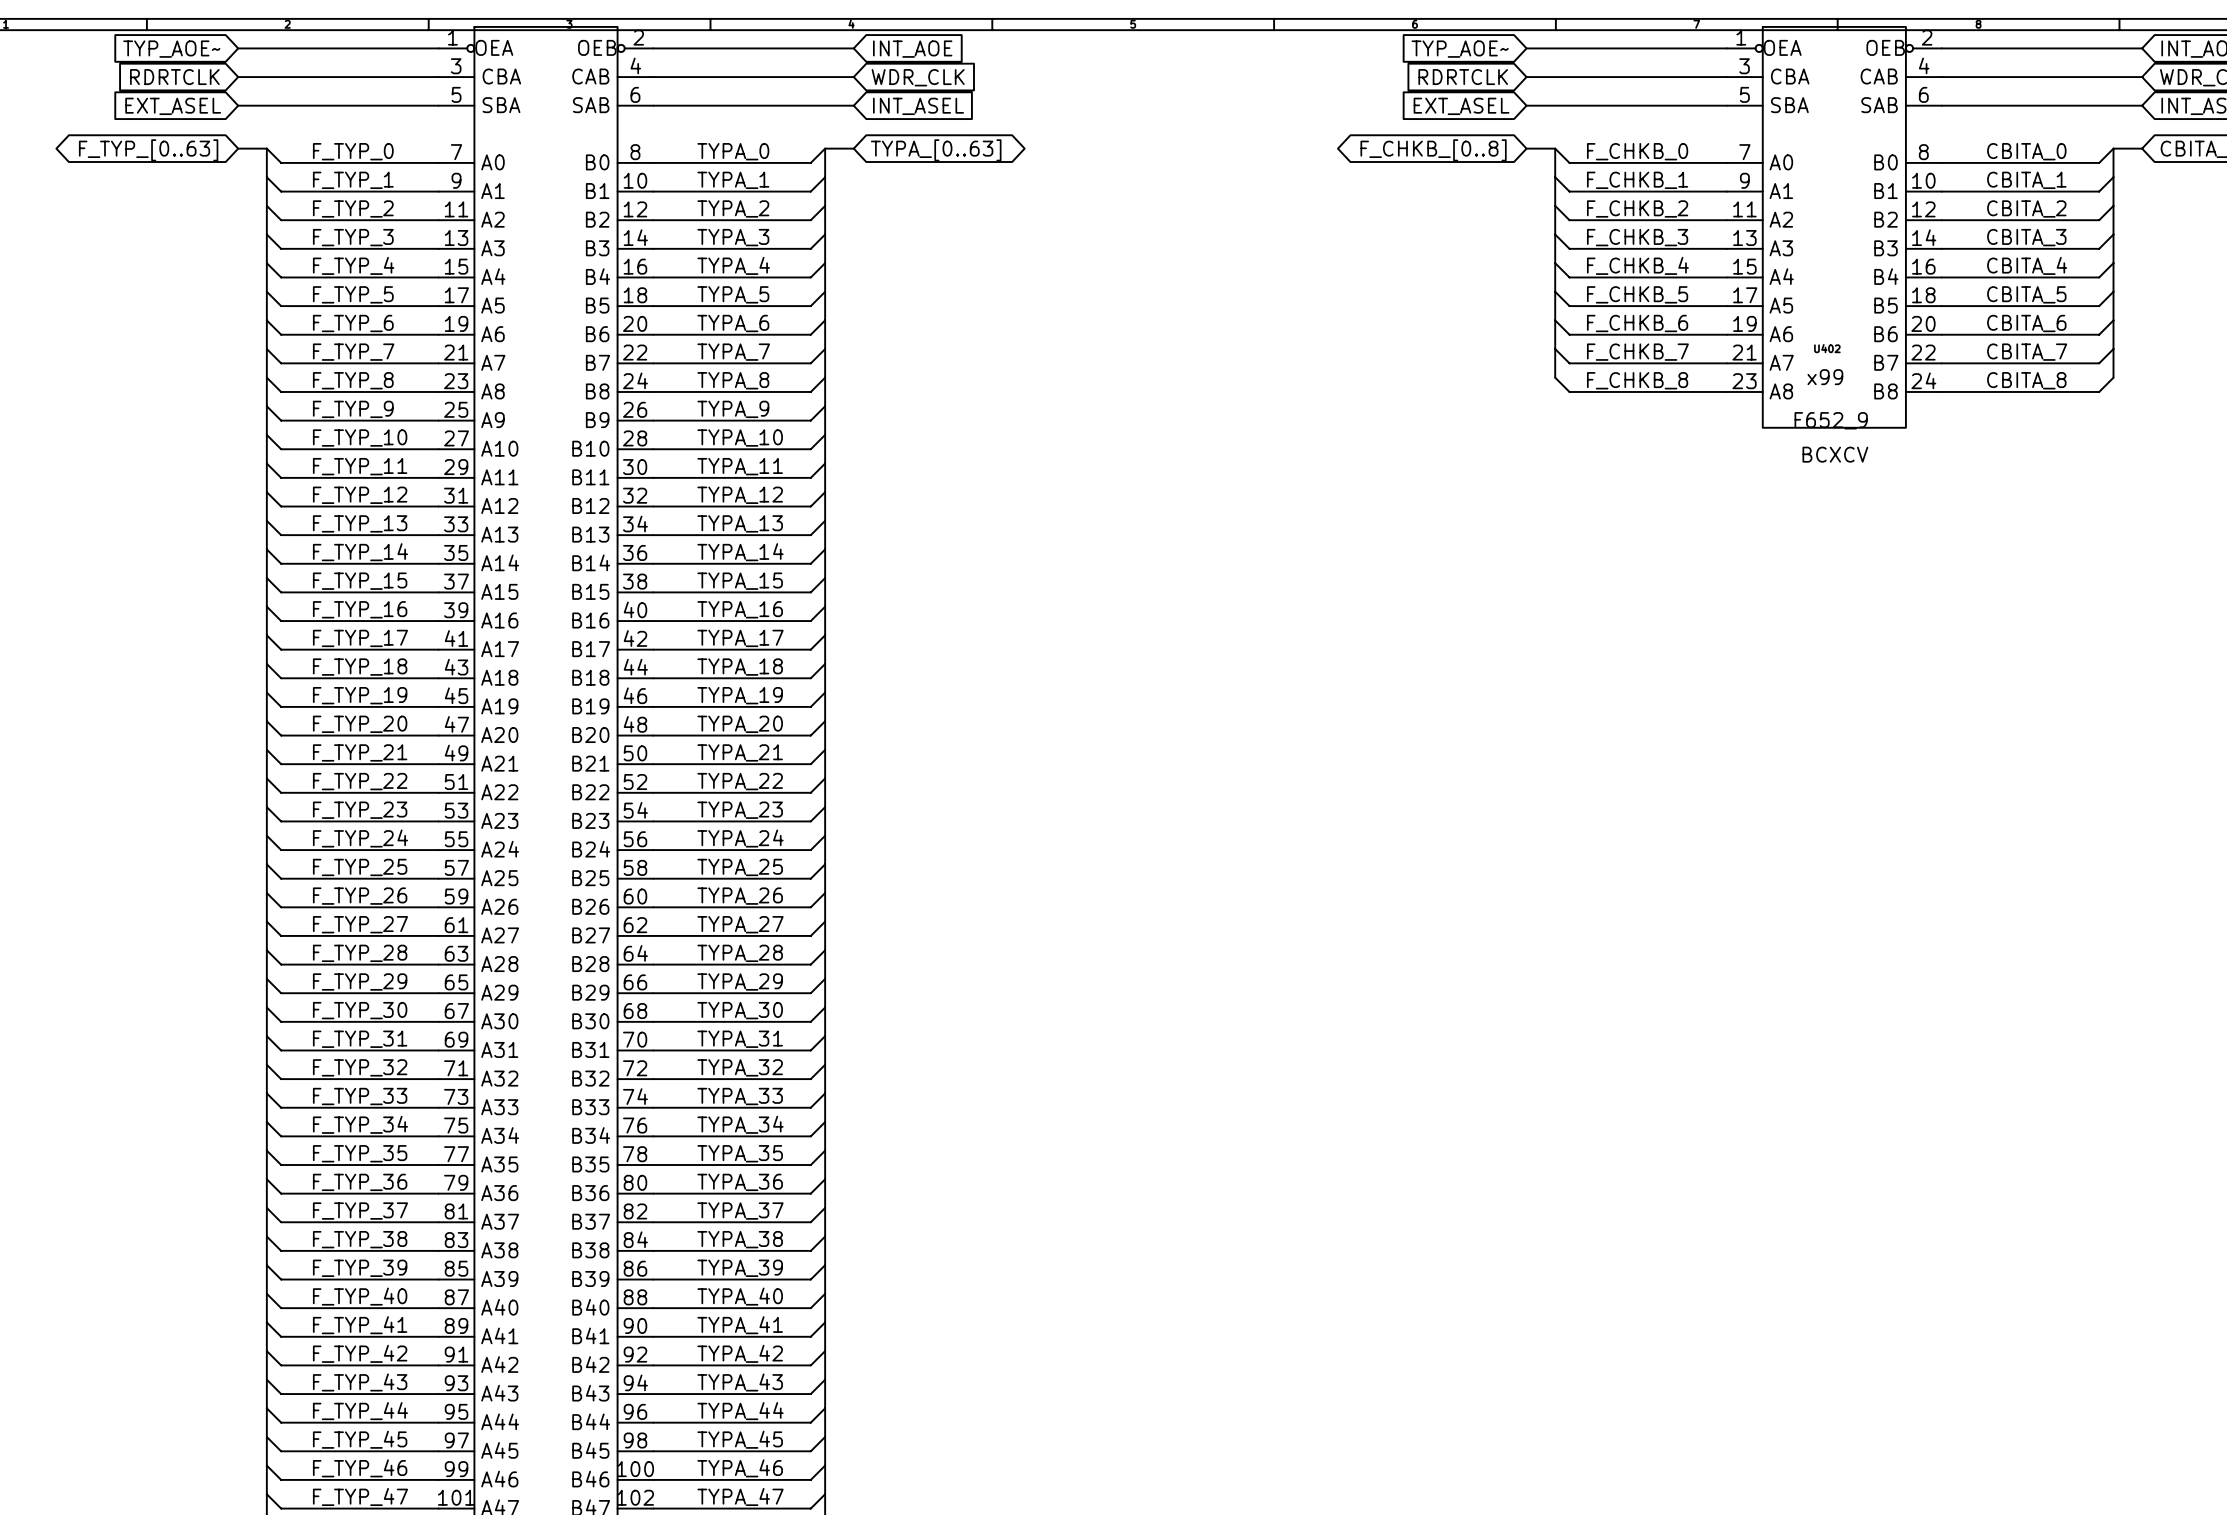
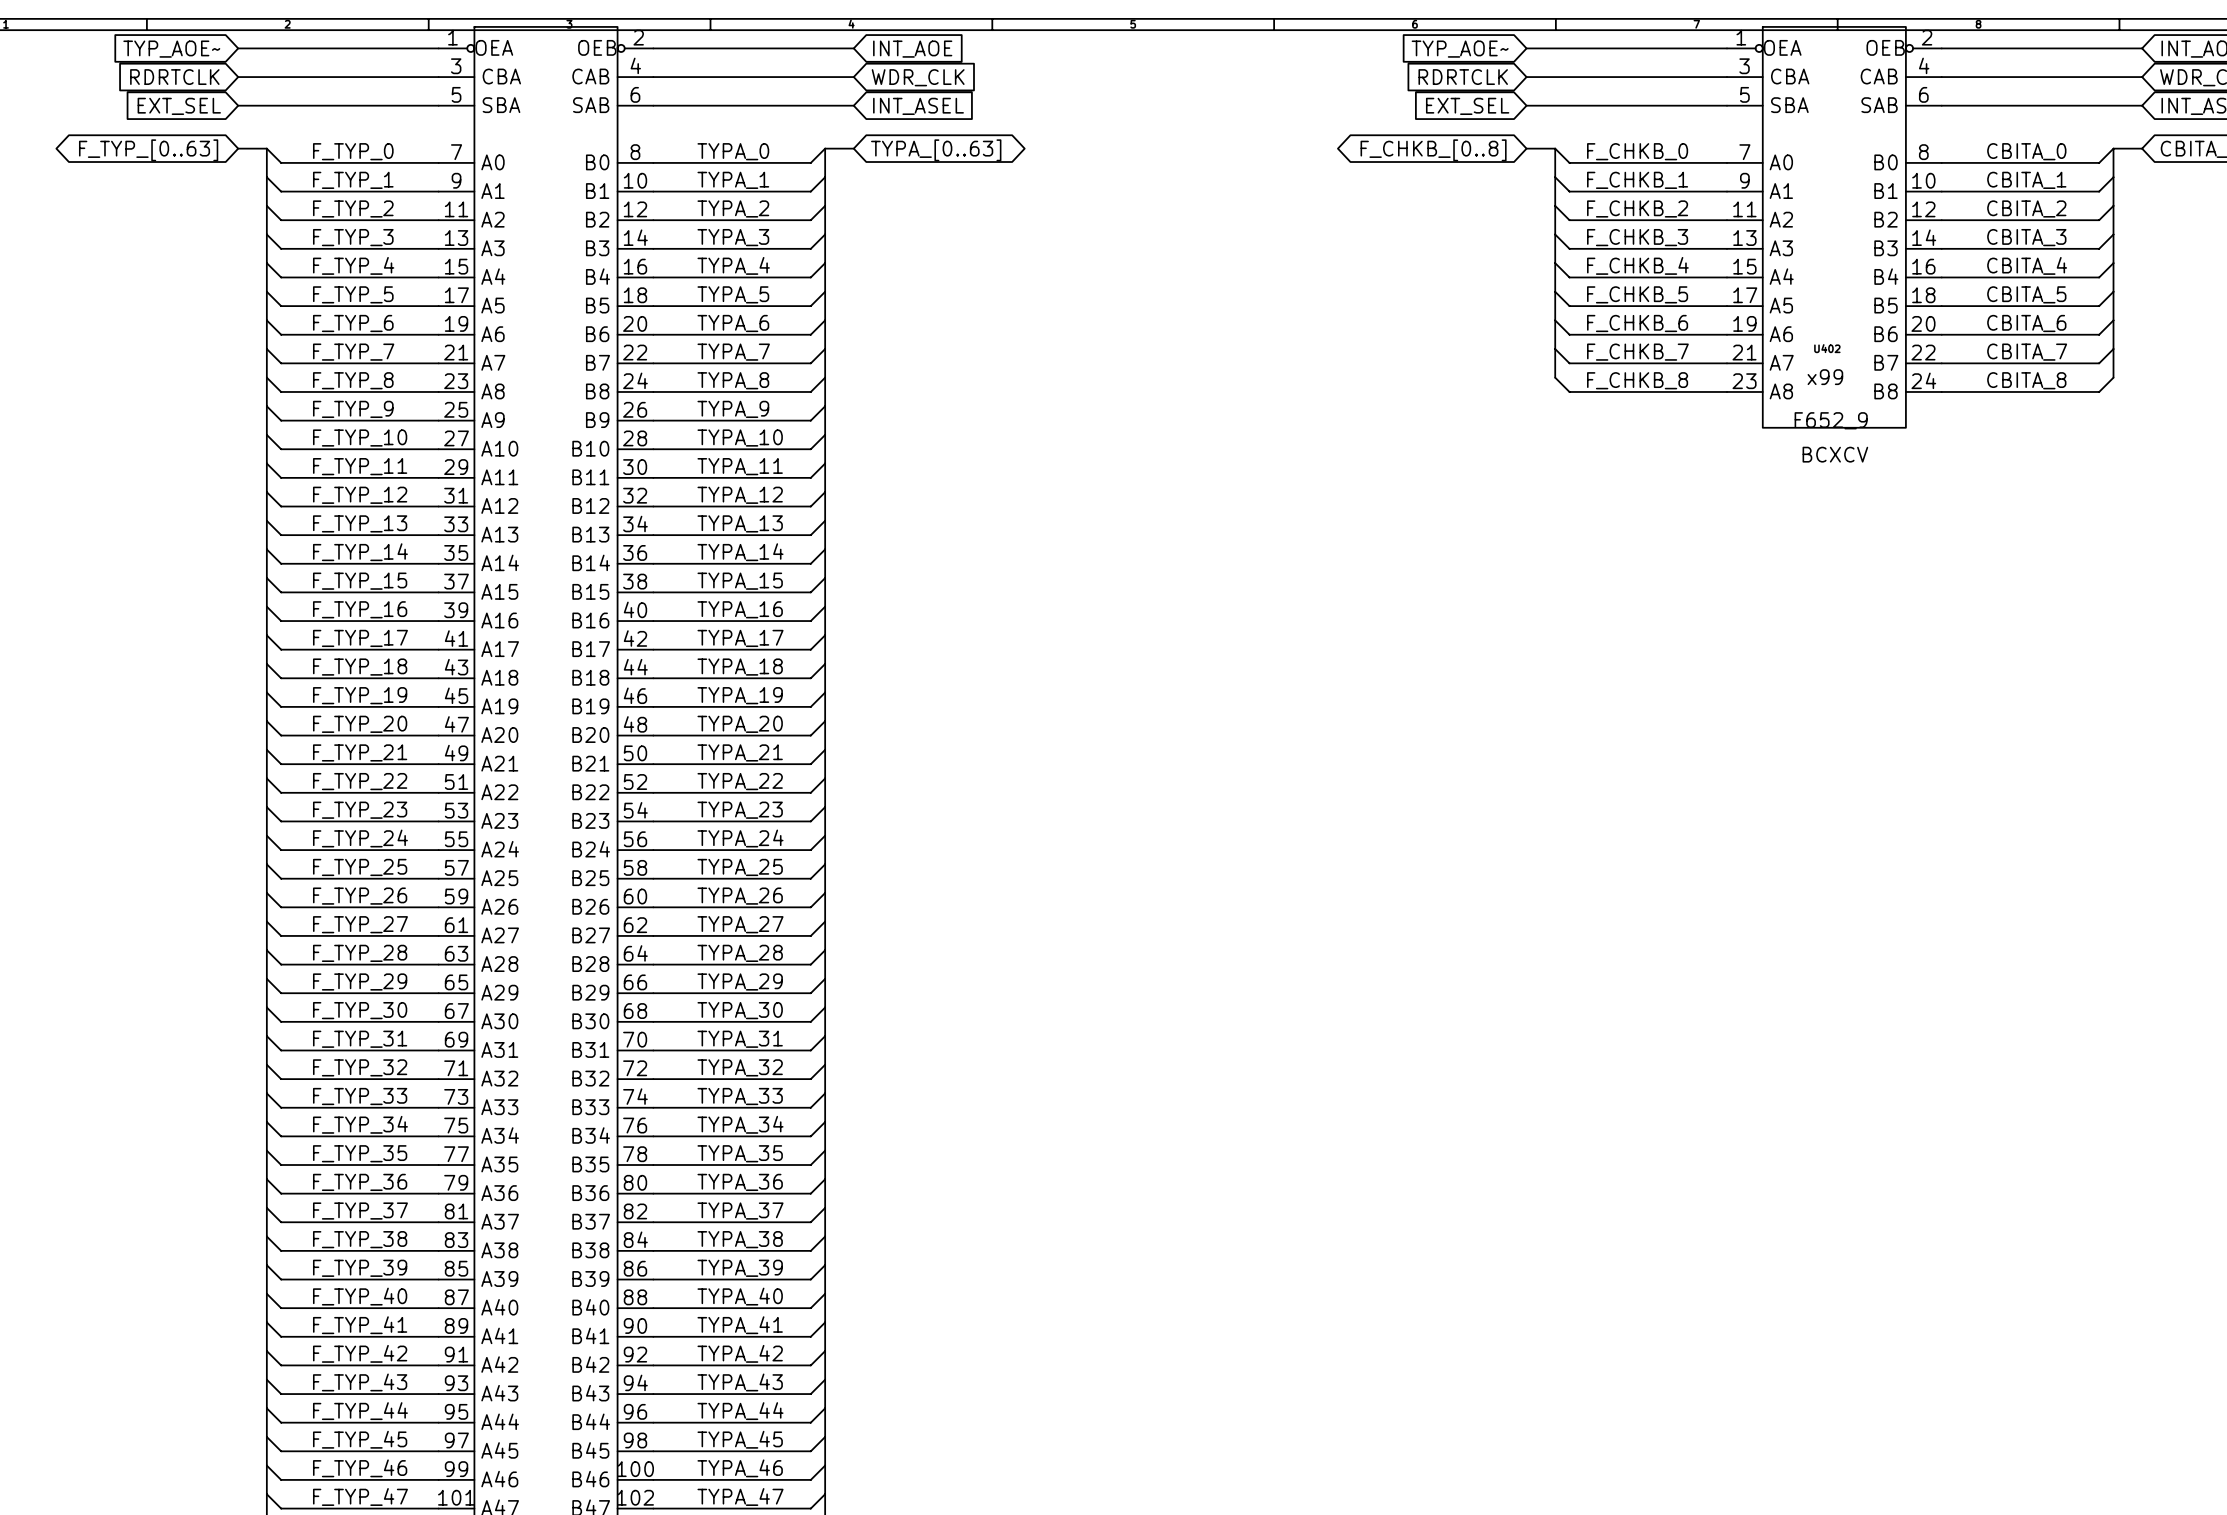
global label: EXT_ASEL (173, 106) -> EXT_SEL (179, 106)
global label: EXT_ASEL (1461, 106) -> EXT_SEL (1467, 106)

